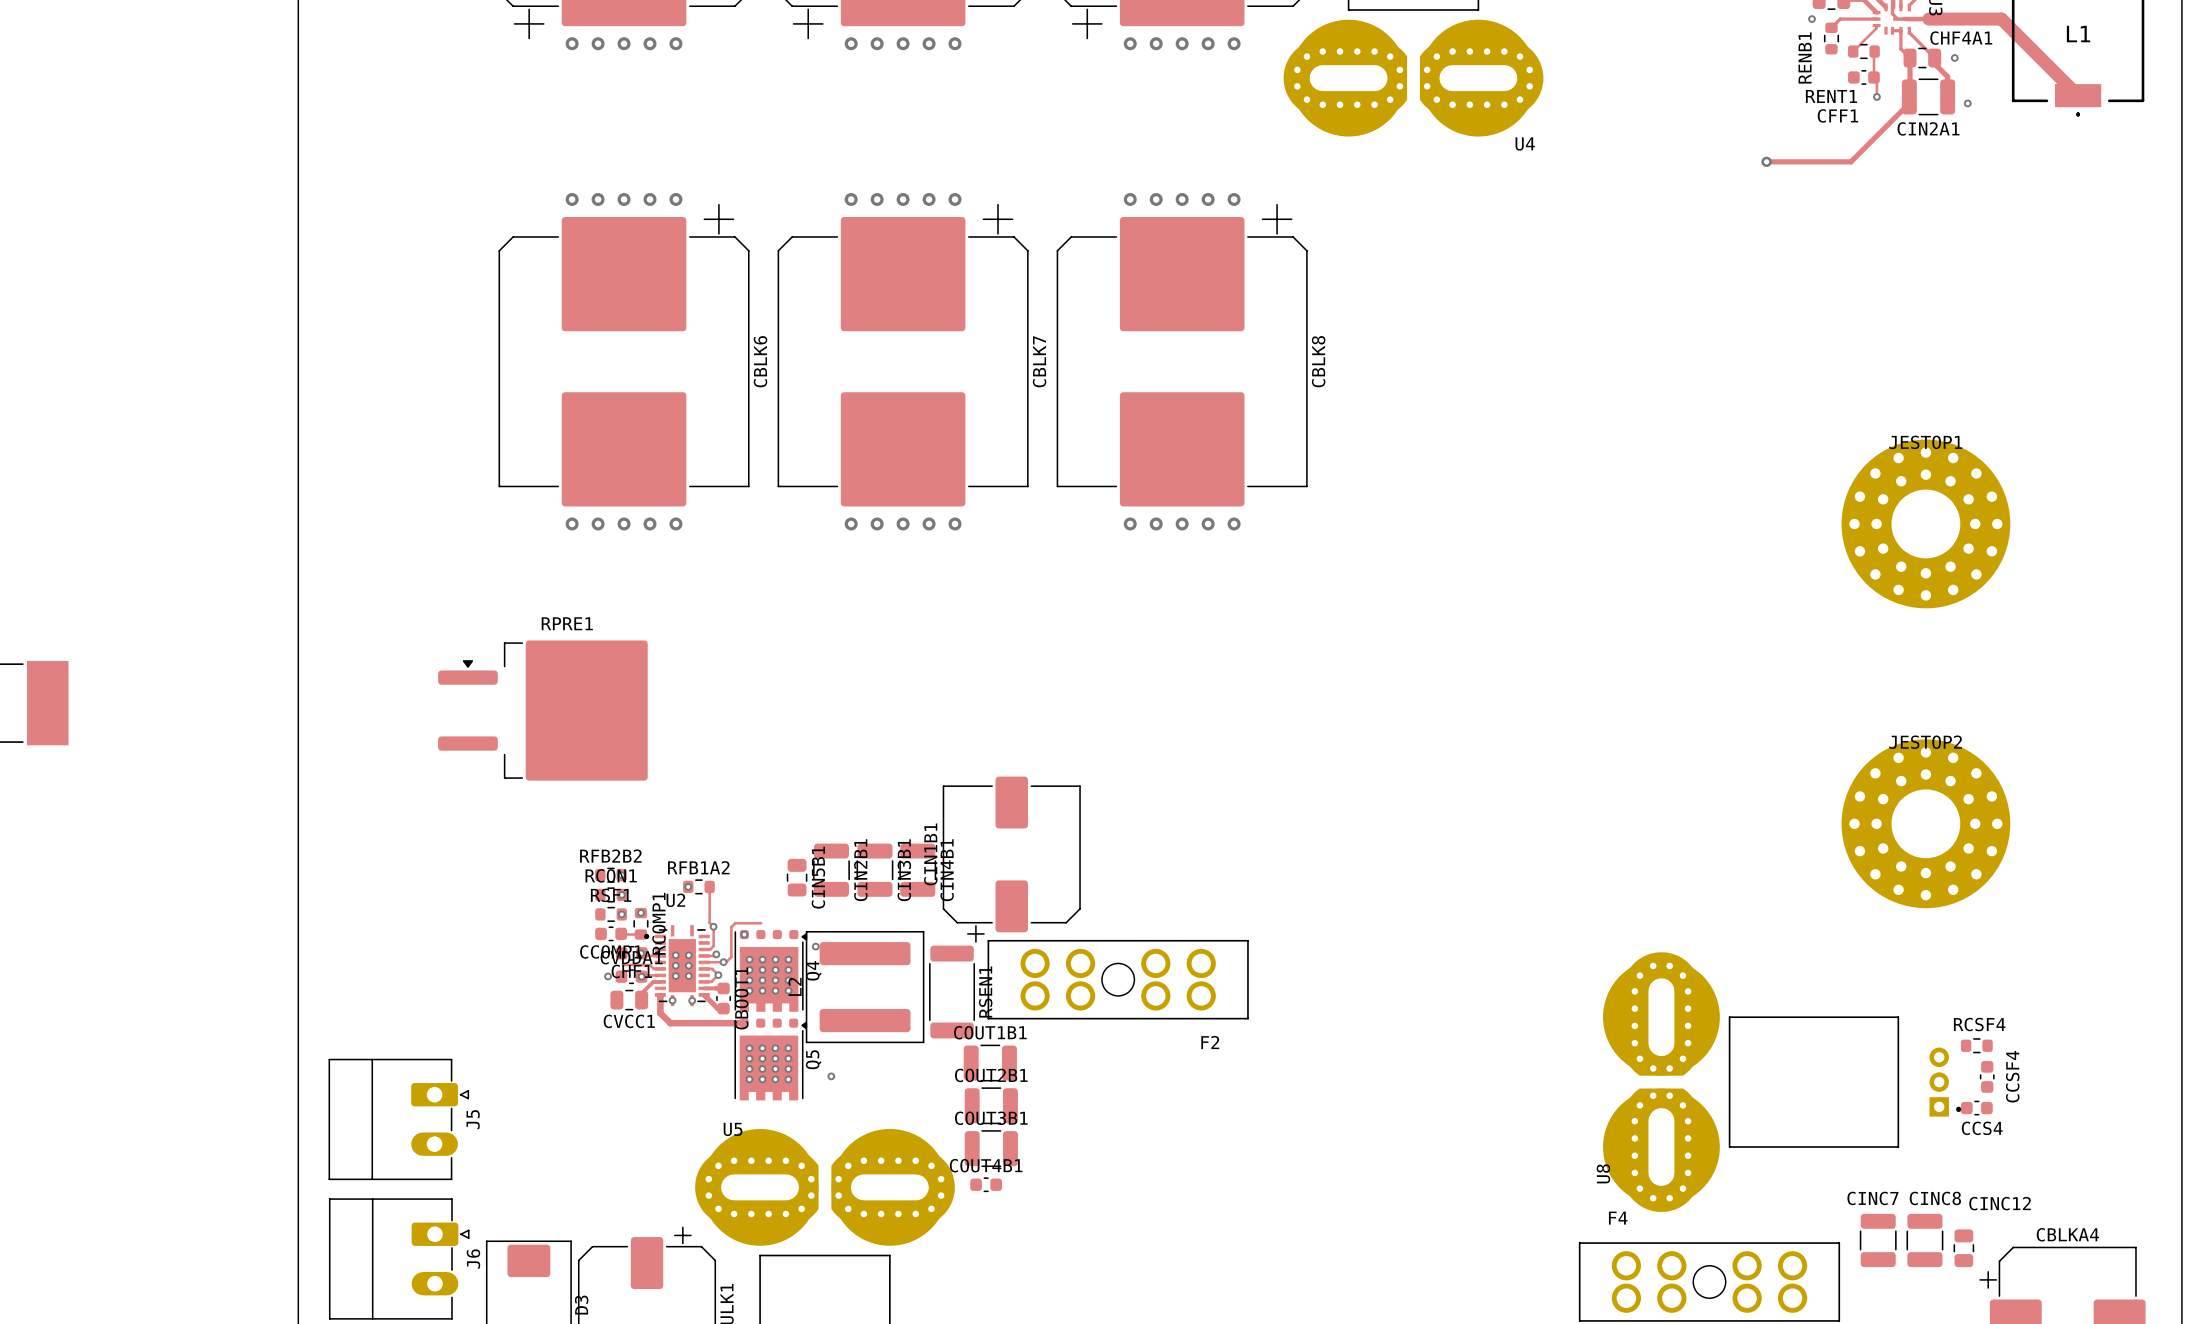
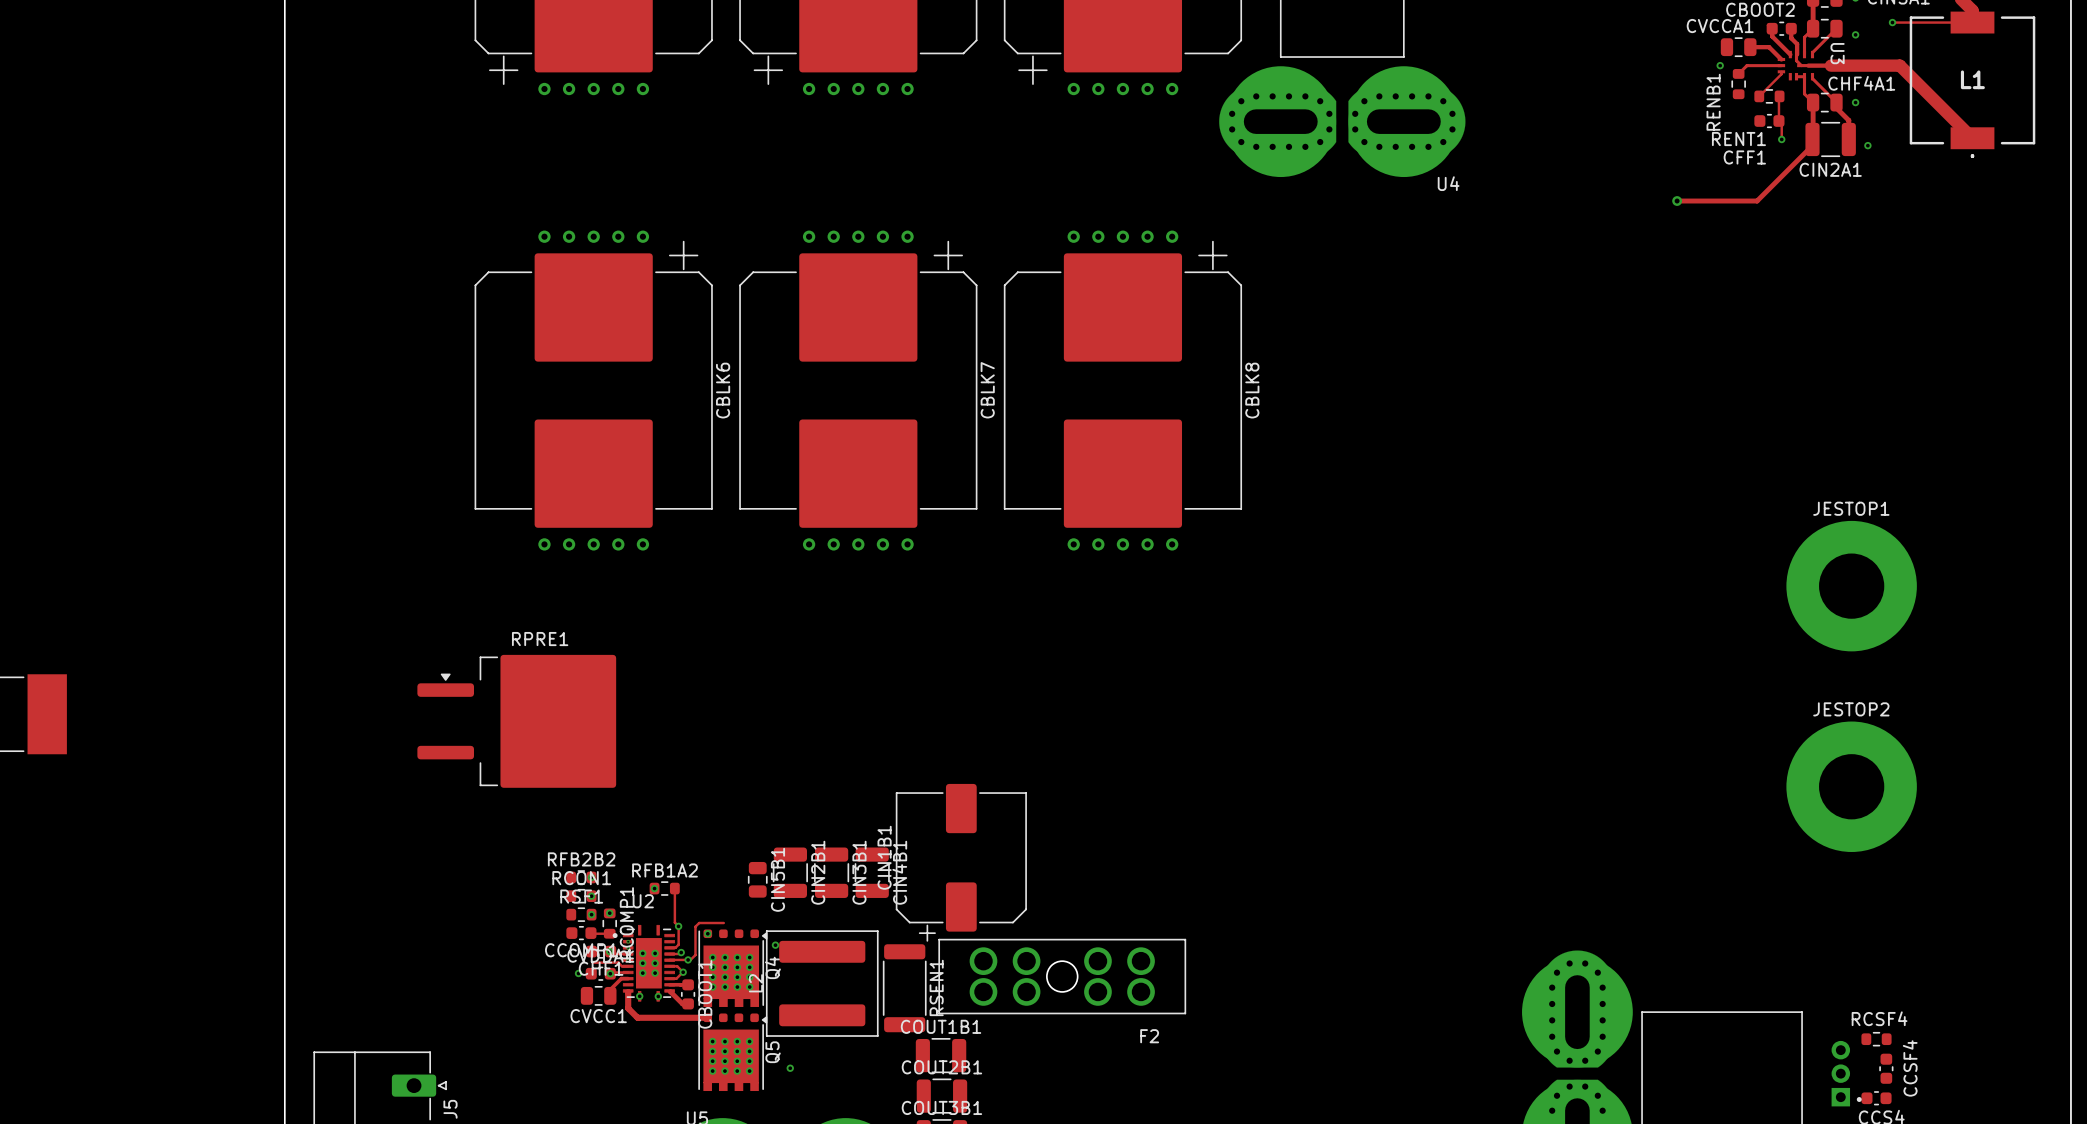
JESTOP1 footprint: [1841, 439, 2011, 609] -> [1786, 520, 1917, 652]
JESTOP2 footprint: [1841, 739, 2011, 909] -> [1786, 721, 1917, 852]

